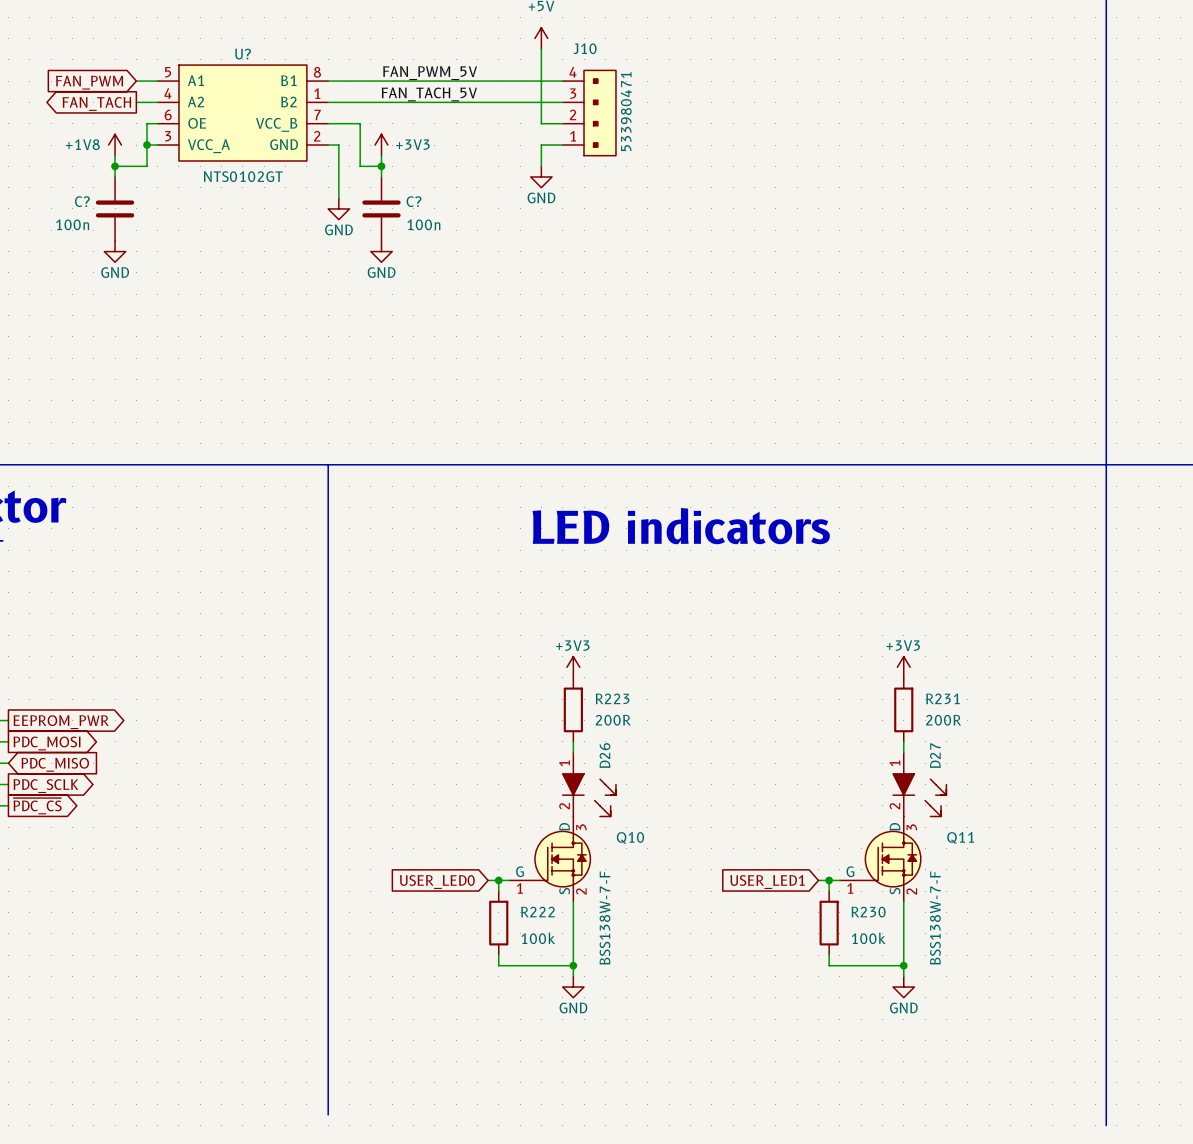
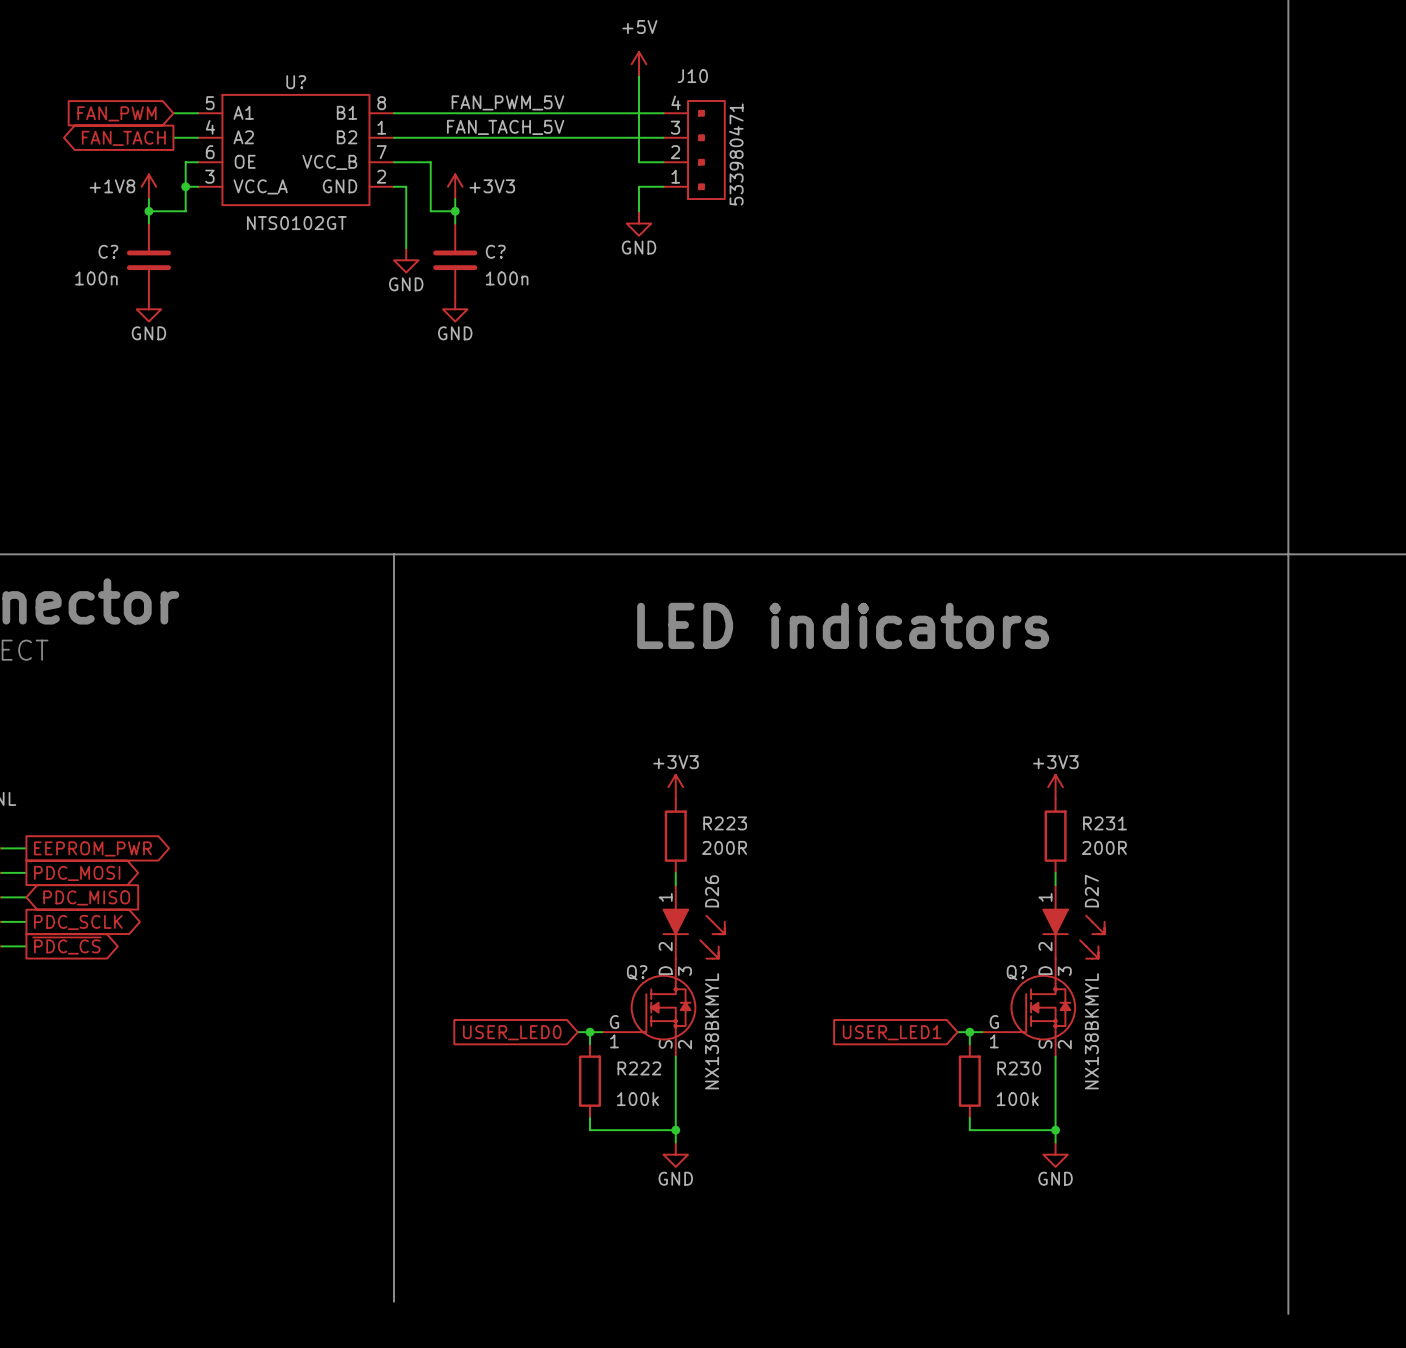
Q10 name: Q10 (630, 837) -> Q? (637, 972)
Q11 name: Q11 (960, 837) -> Q? (1016, 972)
Q10 value: BSS138W-7-F (604, 918) -> NX138BKMYL (712, 1031)
Q11 value: BSS138W-7-F (935, 918) -> NX138BKMYL (1091, 1031)

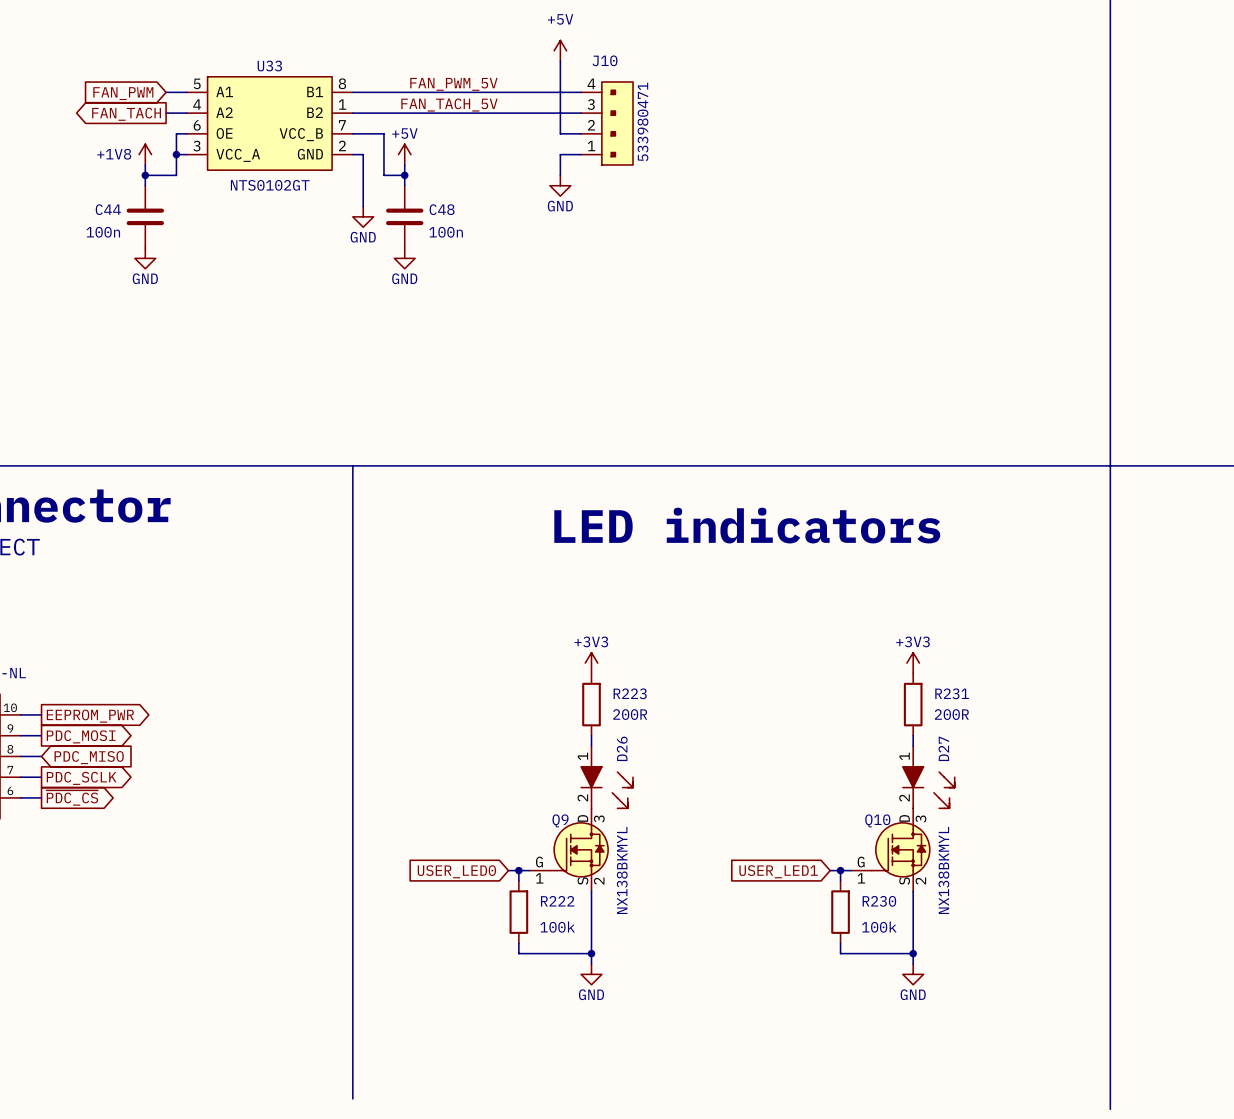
U? name: U? (296, 82) -> U33 (269, 66)
power symbol: +3V3 (455, 186) -> +5V (404, 154)
C? name: C? (108, 251) -> C44 (108, 209)
C? name: C? (495, 251) -> C48 (442, 209)
Q? name: Q? (637, 972) -> Q9 (560, 820)
Q? name: Q? (1016, 972) -> Q10 (877, 820)

